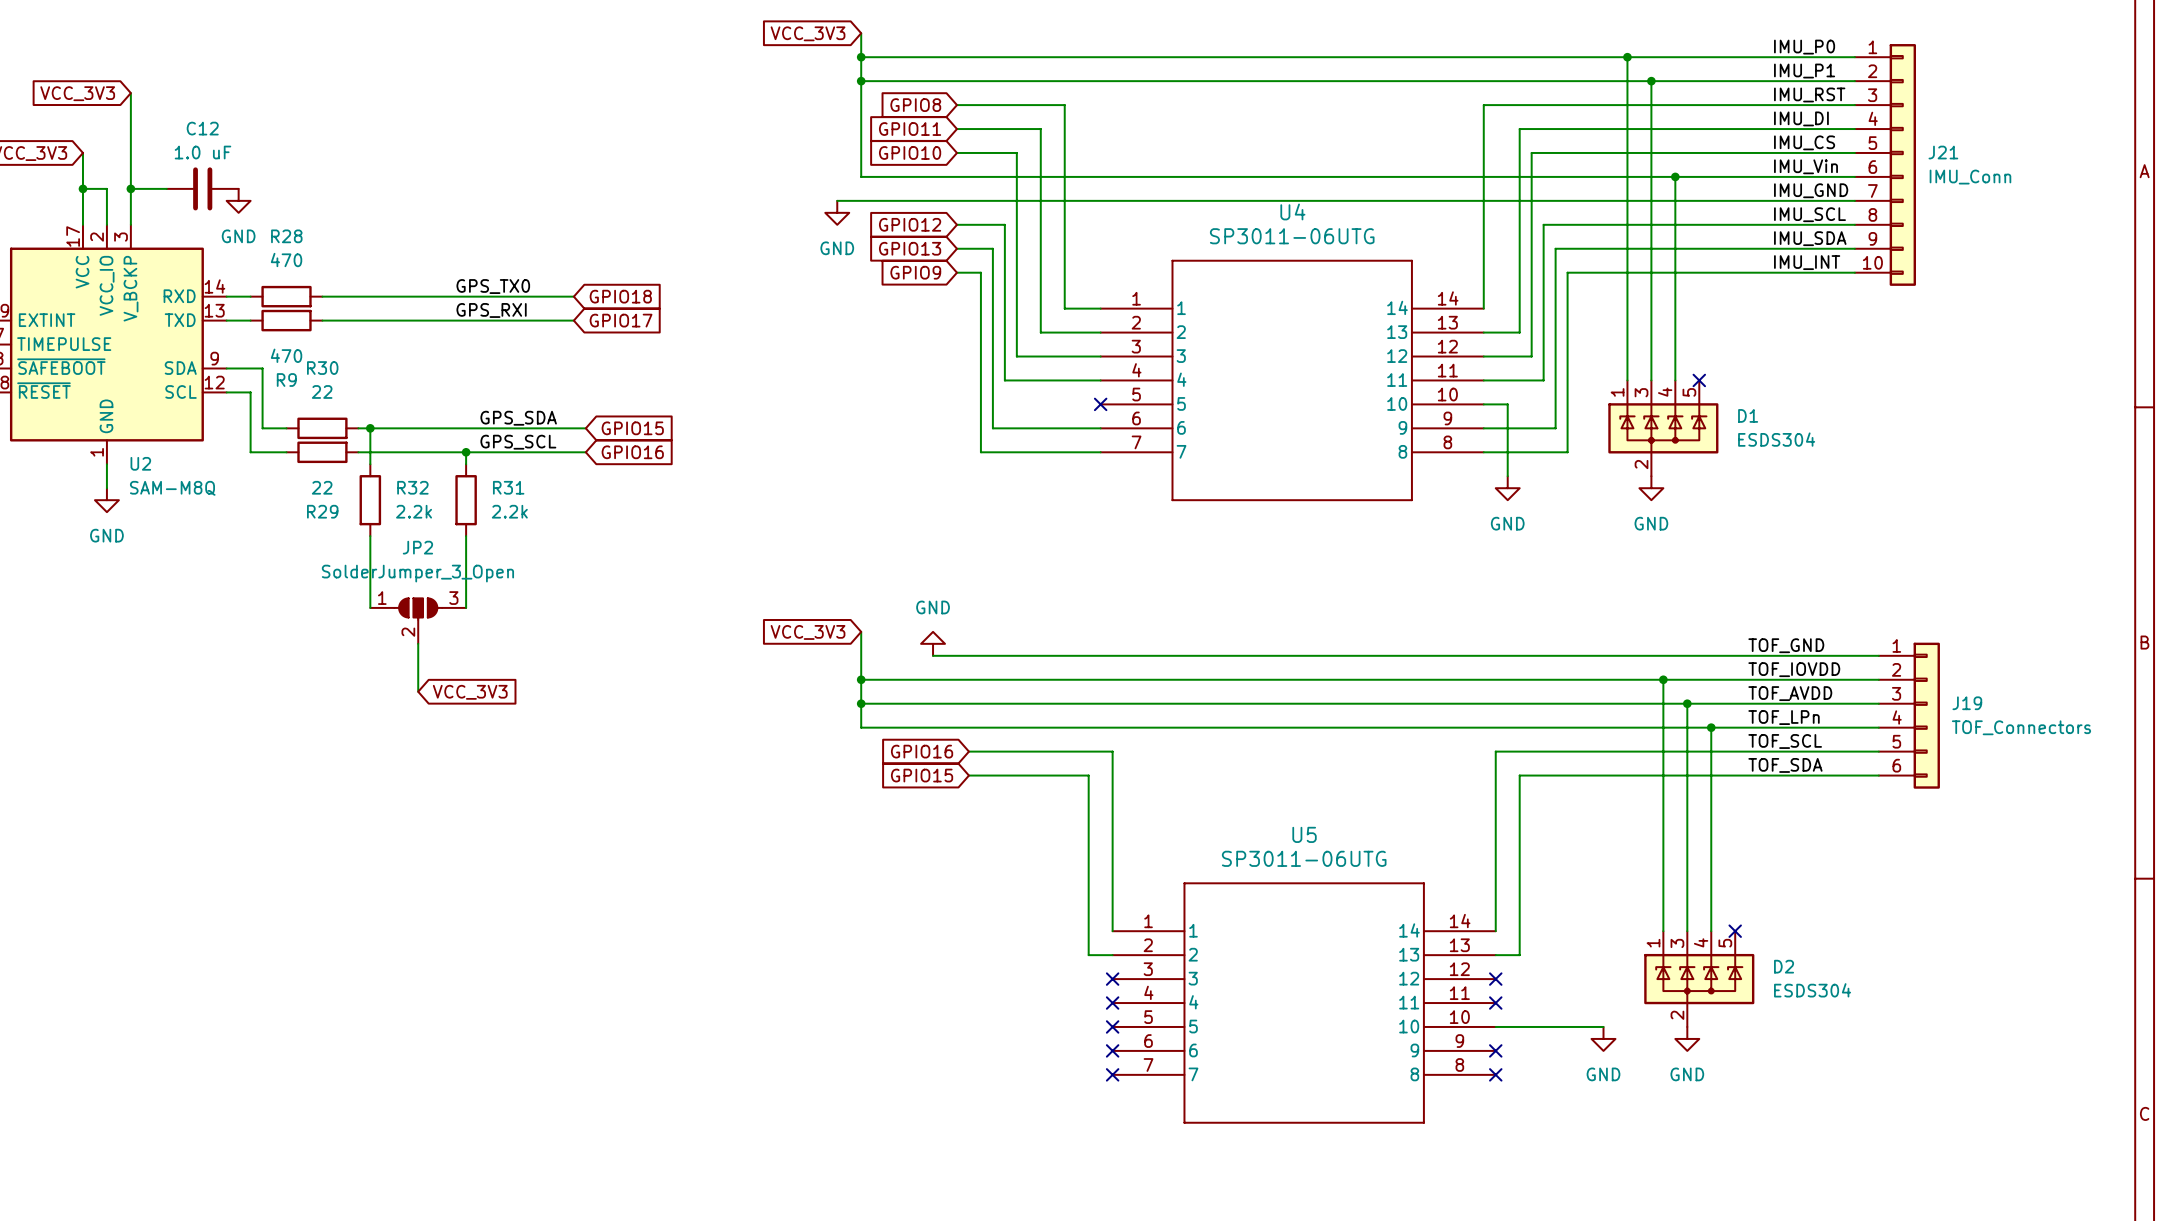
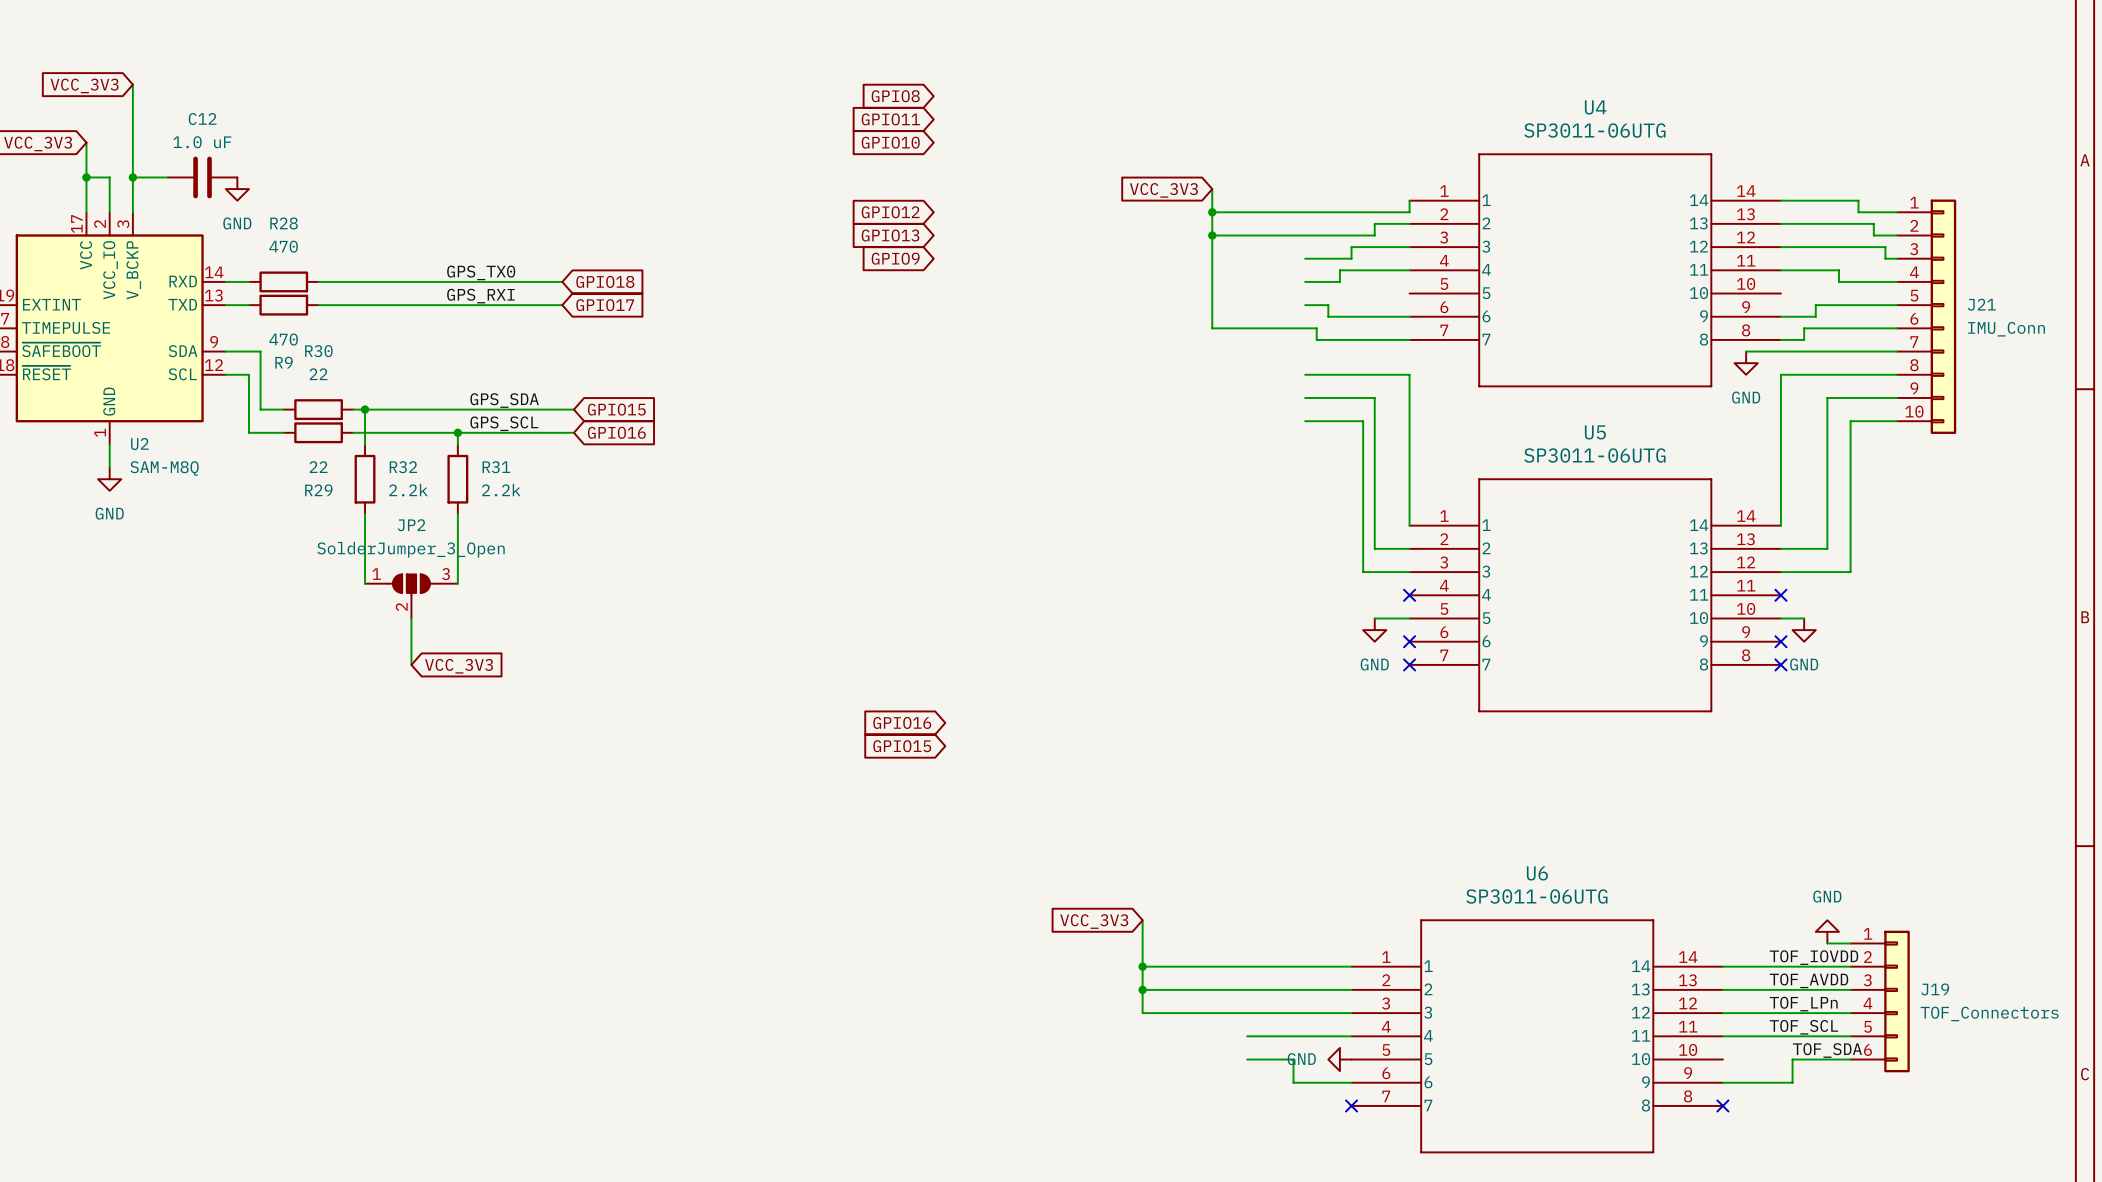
global label: VCC_3V3 (808, 33) -> none
wire: (861, 33) (861, 176) (1854, 176) -> none
label: IMU_P0 (1804, 47) -> none
wire: (861, 57) (1854, 57) -> none
junction: (861, 57) -> none
wire: (1627, 57) (1627, 380) -> none
junction: (1627, 57) -> none
label: IMU_P1 (1804, 71) -> none
wire: (861, 81) (1854, 81) -> none
junction: (861, 81) -> none
wire: (1651, 81) (1651, 380) -> none
junction: (1651, 81) -> none
label: IMU_RST (1809, 94) -> none
wire: (956, 105) (1064, 105) (1064, 308) (1100, 308) -> none
wire: (1854, 105) (1483, 105) (1483, 308) -> none
label: IMU_DI (1801, 118) -> none
wire: (956, 129) (1040, 129) (1040, 332) (1100, 332) -> none
wire: (1854, 129) (1519, 129) (1519, 332) (1483, 332) -> none
label: IMU_CS (1804, 142) -> none
wire: (956, 152) (1016, 152) (1016, 356) (1100, 356) -> none
wire: (1854, 152) (1531, 152) (1531, 356) (1483, 356) -> none
J21 position: (1885, 164) -> (1926, 316)
label: IMU_Vin (1805, 166) -> none
wire: (1675, 176) (1675, 380) -> none
junction: (1675, 176) -> none
label: IMU_GND (1811, 190) -> none
wire: (837, 200) (1854, 200) -> none
wire: none -> (1212, 189) (1212, 328) (1316, 328) (1316, 339) (1409, 339)
global label: none -> VCC_3V3 (1163, 190)
power symbol: GND (837, 212) -> none
wire: none -> (1409, 200) (1409, 212) (1212, 212)
wire: none -> (1780, 200) (1858, 200) (1858, 212) (1897, 212)
label: IMU_SCL (1809, 214) -> none
wire: (956, 224) (1004, 224) (1004, 380) (1100, 380) -> none
junction: none -> (1212, 212)
wire: (1854, 224) (1543, 224) (1543, 380) (1483, 380) -> none
wire: none -> (1409, 223) (1374, 223) (1374, 235) (1212, 235)
wire: none -> (1780, 223) (1873, 223) (1873, 235) (1897, 235)
label: IMU_SDA (1810, 238) -> none
wire: (956, 248) (992, 248) (992, 428) (1100, 428) -> none
junction: none -> (1212, 235)
wire: (1854, 248) (1555, 248) (1555, 428) (1483, 428) -> none
wire: none -> (1409, 247) (1351, 247) (1351, 258) (1305, 258)
wire: none -> (1780, 247) (1885, 247) (1885, 258) (1897, 258)
label: IMU_INT (1807, 262) -> none
wire: (956, 272) (980, 272) (980, 452) (1100, 452) -> none
wire: (1854, 272) (1567, 272) (1567, 452) (1483, 452) -> none
wire: none -> (1409, 270) (1339, 270) (1339, 281) (1305, 281)
wire: none -> (1780, 270) (1838, 270) (1838, 281) (1897, 281)
wire: none -> (1305, 305) (1328, 305) (1328, 316) (1409, 316)
wire: none -> (1897, 305) (1815, 305) (1815, 316) (1780, 316)
wire: none -> (1897, 328) (1804, 328) (1804, 339) (1780, 339)
wire: none -> (1746, 351) (1897, 351)
U4 position: (1292, 380) -> (1595, 270)
no-connect mark: (1699, 380) -> none
power symbol: none -> GND (1746, 363)
wire: none -> (1305, 374) (1409, 374) (1409, 525)
wire: none -> (1897, 374) (1780, 374) (1780, 525)
no-connect mark: (1100, 404) -> none
wire: (1483, 404) (1507, 404) (1507, 476) -> none
wire: none -> (1305, 397) (1374, 397) (1374, 548) (1409, 548)
wire: none -> (1897, 397) (1827, 397) (1827, 548) (1780, 548)
D1: ESDS304 (1663, 428) -> none
wire: none -> (1305, 421) (1363, 421) (1363, 572) (1409, 572)
wire: none -> (1897, 421) (1850, 421) (1850, 572) (1780, 572)
power symbol: GND (1507, 488) -> none
power symbol: GND (1651, 488) -> none
no-connect mark: none -> (1409, 595)
no-connect mark: none -> (1780, 595)
wire: (861, 631) (861, 727) (1878, 727) -> none
global label: VCC_3V3 (808, 632) -> none
power symbol: GND (933, 643) -> none
wire: none -> (1374, 618) (1409, 618)
wire: none -> (1780, 618) (1804, 618)
label: TOF_GND (1786, 645) -> none
wire: (933, 655) (1878, 655) -> none
power symbol: none -> GND (1374, 630)
power symbol: none -> GND (1804, 630)
no-connect mark: none -> (1409, 641)
no-connect mark: none -> (1780, 641)
label: TOF_IOVDD (1794, 669) -> none
wire: (861, 679) (1878, 679) -> none
junction: (861, 679) -> none
wire: (1663, 679) (1663, 931) -> none
junction: (1663, 679) -> none
no-connect mark: none -> (1409, 664)
no-connect mark: none -> (1780, 664)
label: TOF_AVDD (1790, 693) -> none
wire: (861, 703) (1878, 703) -> none
junction: (861, 703) -> none
wire: (1687, 703) (1687, 931) -> none
junction: (1687, 703) -> none
J19 position: (1909, 715) -> (1880, 1001)
label: TOF_LPn (1784, 717) -> none
wire: (1711, 727) (1711, 931) -> none
junction: (1711, 727) -> none
label: TOF_SCL (1785, 741) -> none
wire: (968, 751) (1112, 751) (1112, 931) -> none
wire: (1878, 751) (1495, 751) (1495, 931) -> none
label: TOF_SDA (1785, 765) -> none
wire: (968, 775) (1088, 775) (1088, 955) (1112, 955) -> none
wire: (1878, 775) (1519, 775) (1519, 955) (1495, 955) -> none
no-connect mark: (1735, 931) -> none
global label: none -> VCC_3V3 (1094, 921)
wire: none -> (1142, 920) (1142, 1013) (1351, 1013)
power symbol: none -> GND (1827, 931)
no-connect mark: (1112, 979) -> none
no-connect mark: (1495, 979) -> none
D2: ESDS304 (1699, 979) -> none
wire: none -> (1827, 943) (1850, 943)
label: none -> TOF_IOVDD (1813, 957)
no-connect mark: (1112, 1003) -> none
wire: none -> (1142, 966) (1351, 966)
junction: none -> (1142, 966)
U5 position: (1304, 1003) -> (1595, 595)
no-connect mark: (1495, 1003) -> none
wire: none -> (1722, 966) (1850, 966)
label: none -> TOF_AVDD (1809, 980)
no-connect mark: (1112, 1026) -> none
wire: none -> (1142, 989) (1351, 989)
junction: none -> (1142, 989)
wire: (1495, 1026) (1603, 1026) -> (1247, 1036) (1351, 1036)
wire: none -> (1722, 989) (1850, 989)
power symbol: GND (1603, 1038) -> none
power symbol: GND (1687, 1038) -> none
label: none -> TOF_LPn (1803, 1004)
no-connect mark: (1112, 1050) -> none
no-connect mark: (1495, 1050) -> none
wire: none -> (1722, 1013) (1850, 1013)
label: none -> TOF_SCL (1803, 1027)
no-connect mark: (1112, 1074) -> none
no-connect mark: (1495, 1074) -> none
U6: none -> SP3011-06UTG (1537, 1036)
wire: none -> (1722, 1036) (1850, 1036)
label: none -> TOF_SDA (1827, 1050)
wire: none -> (1247, 1059) (1293, 1059) (1293, 1082) (1351, 1082)
power symbol: none -> GND (1339, 1059)
wire: none -> (1850, 1059) (1792, 1059) (1792, 1082) (1722, 1082)
no-connect mark: none -> (1351, 1105)
no-connect mark: none -> (1722, 1105)

